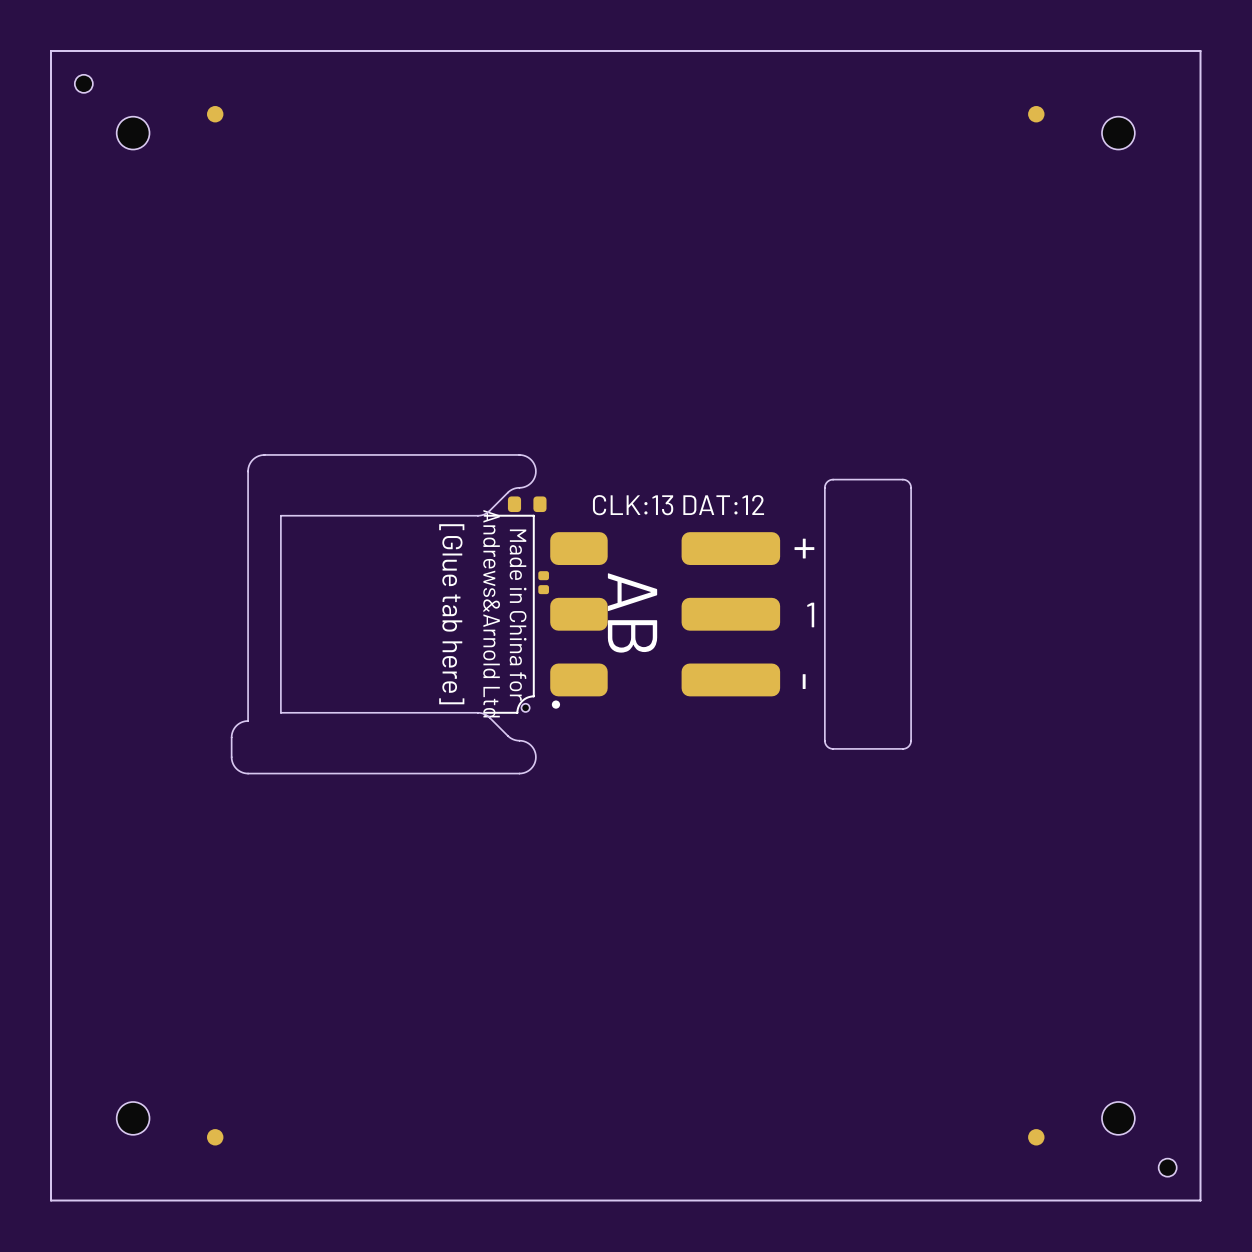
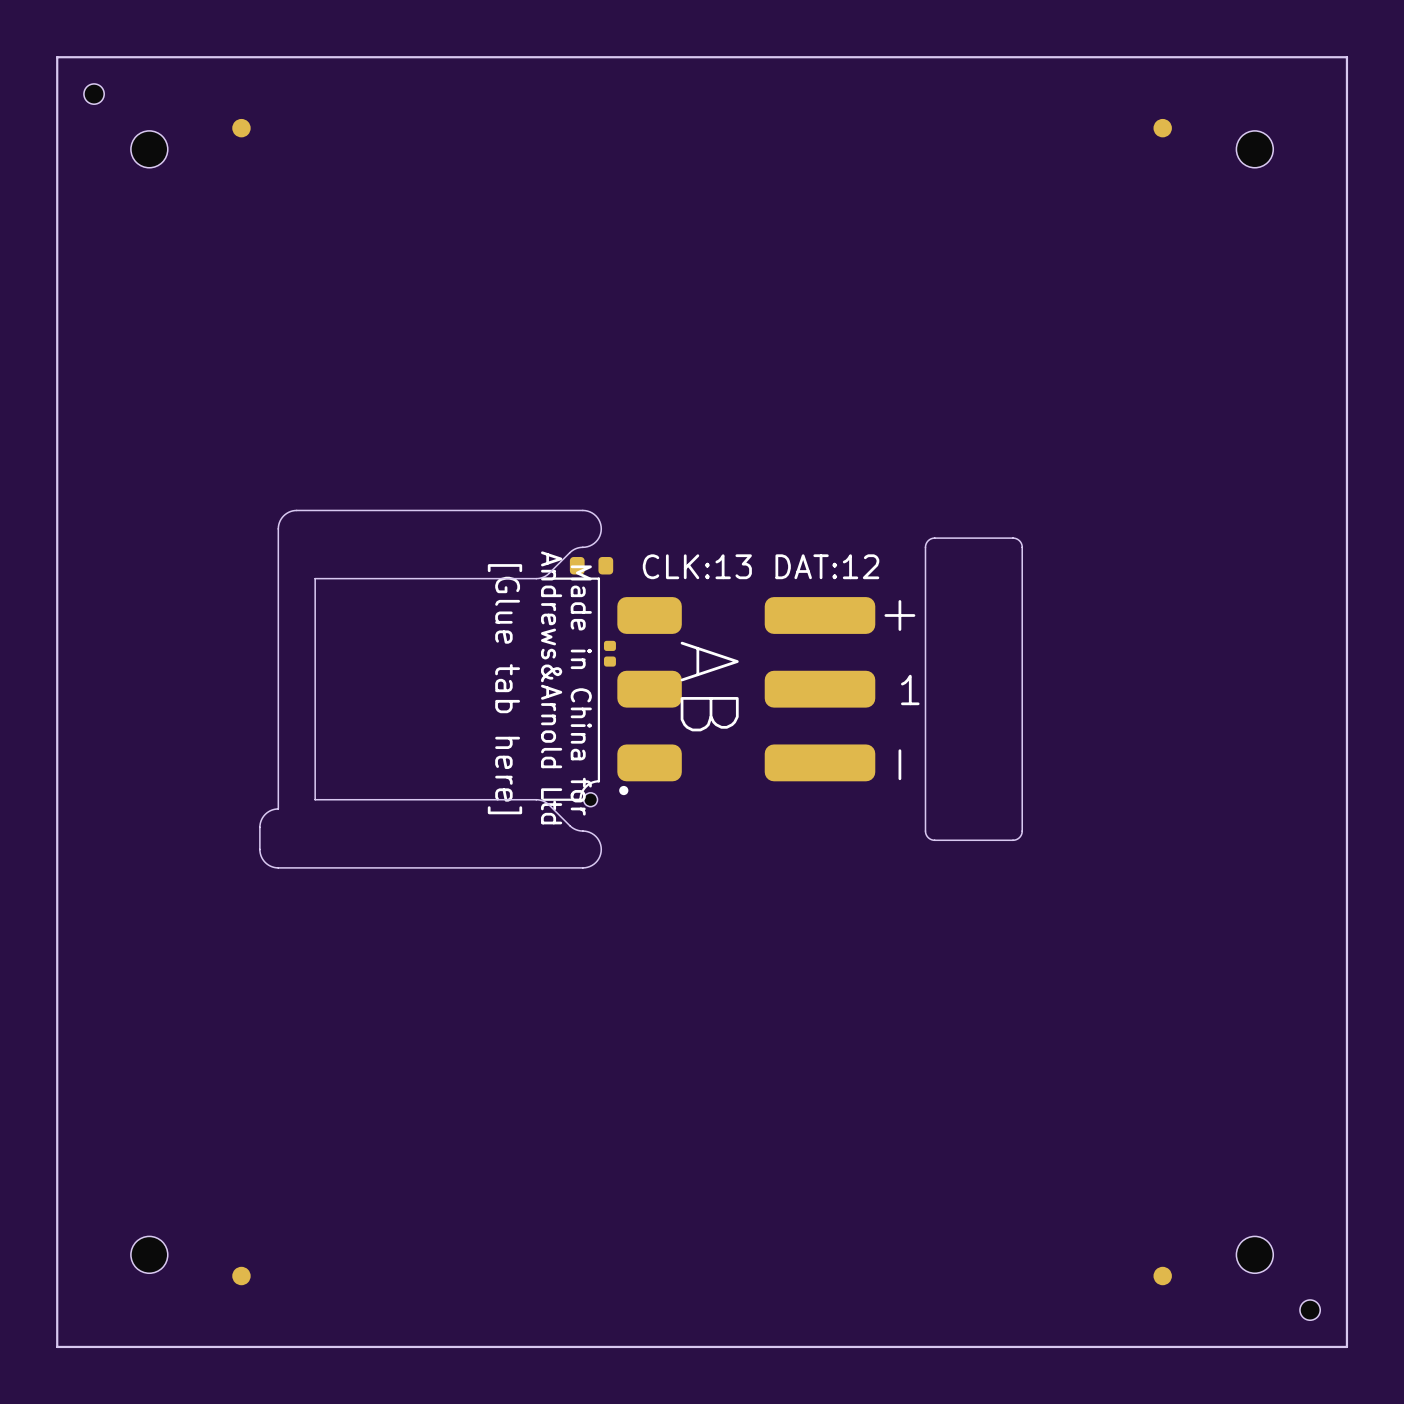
part footprint: [521, 703, 530, 712] -> [583, 792, 598, 807]

